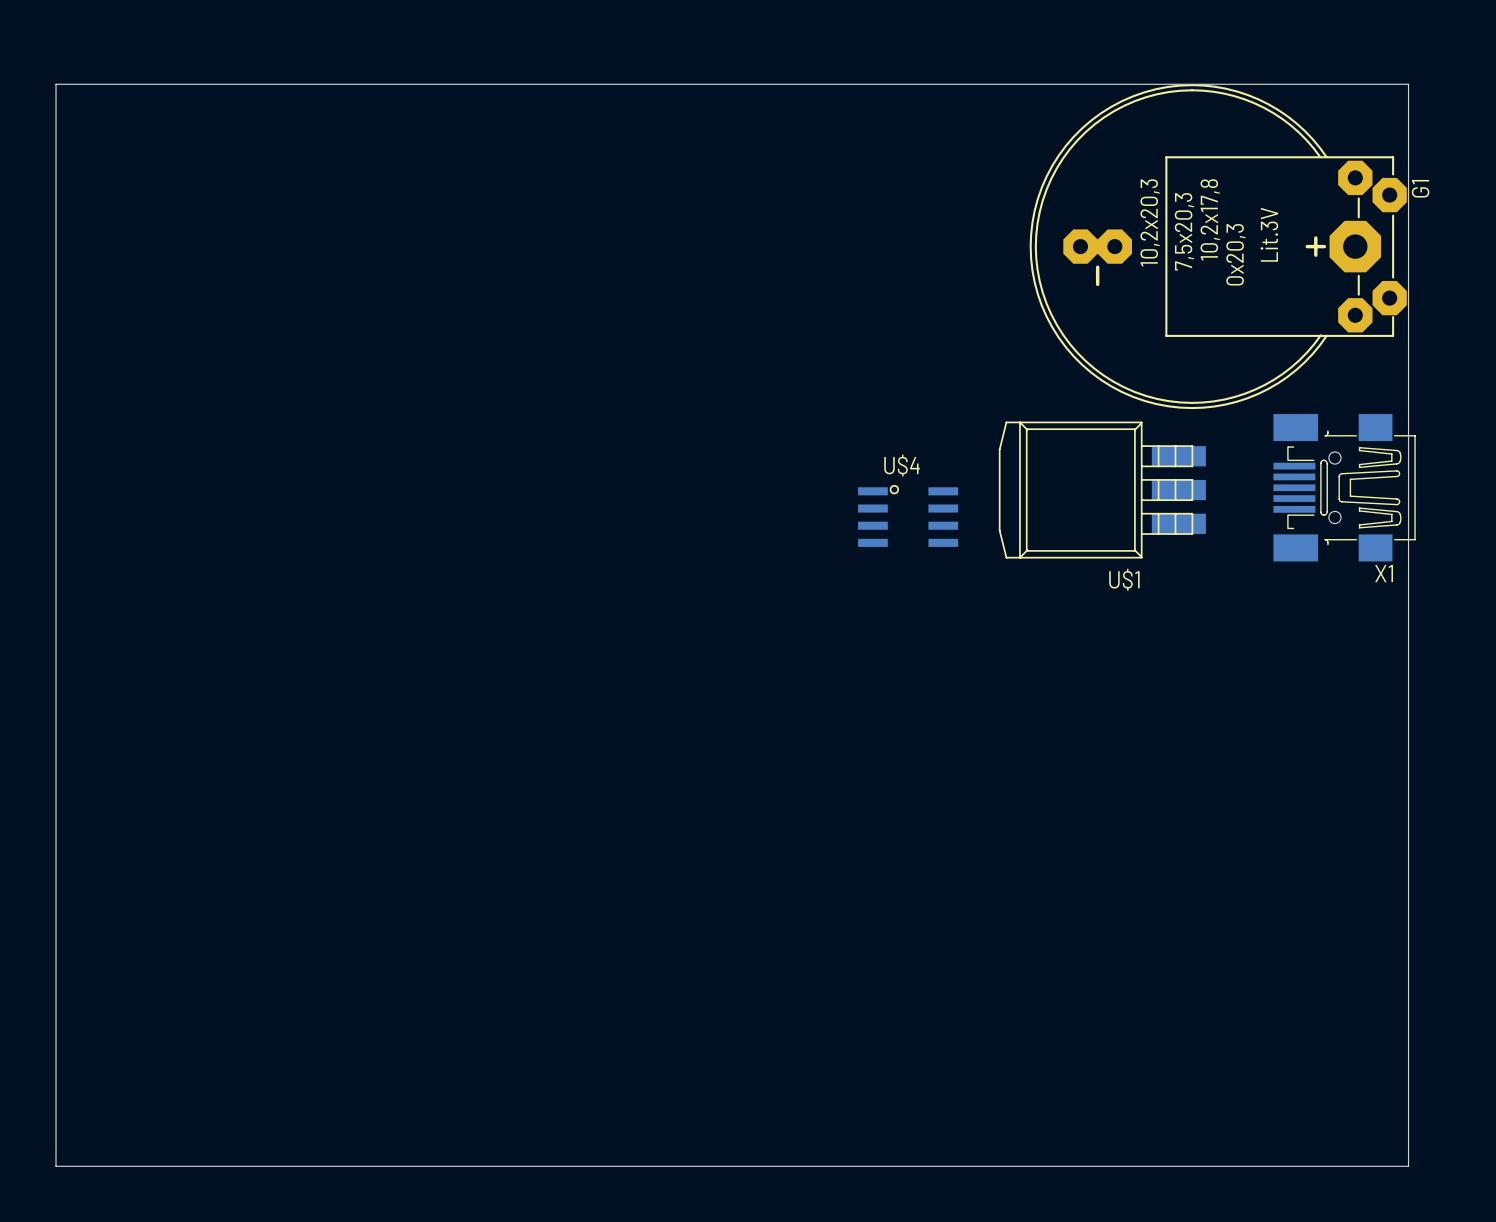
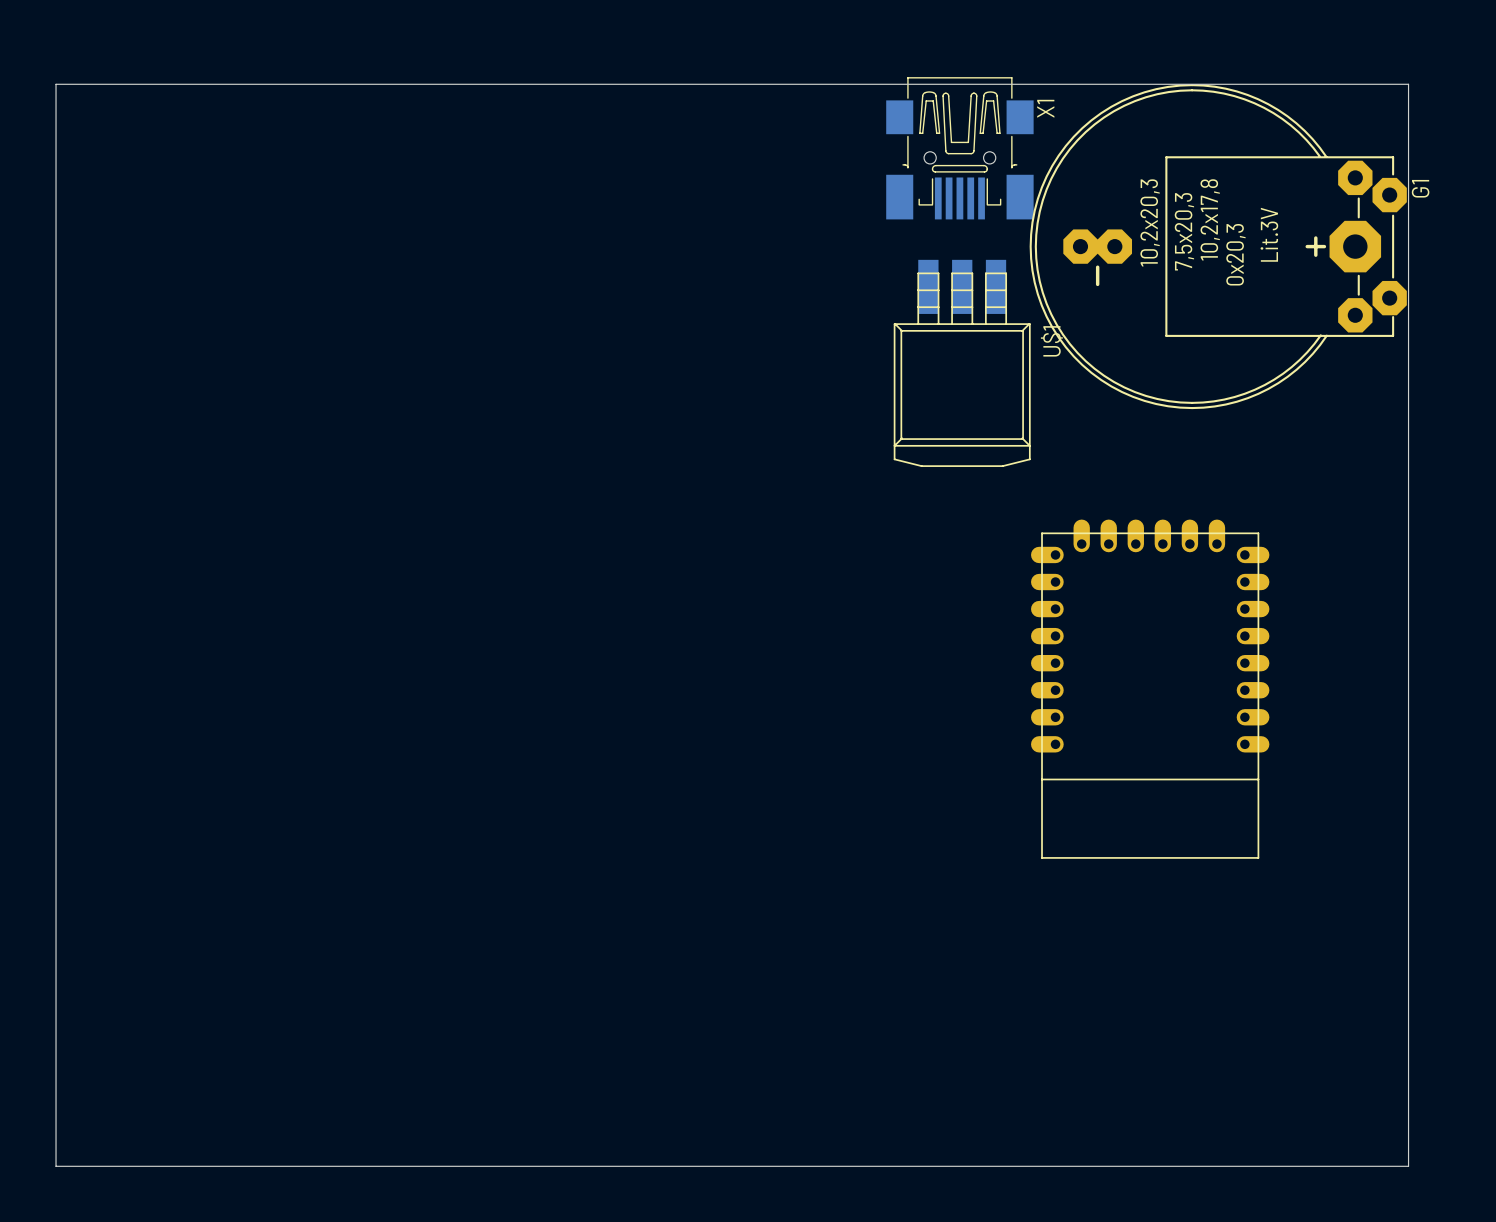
X1 rotation: 0° (1344, 487) -> 90° counterclockwise (959, 148)
X1 position: (1344, 487) -> (959, 148)
U$1 rotation: 0° (1102, 490) -> 90° counterclockwise (962, 363)
U$1 position: (1102, 490) -> (962, 363)
U$4: (908, 515) -> none
part: none -> (1150, 689)

